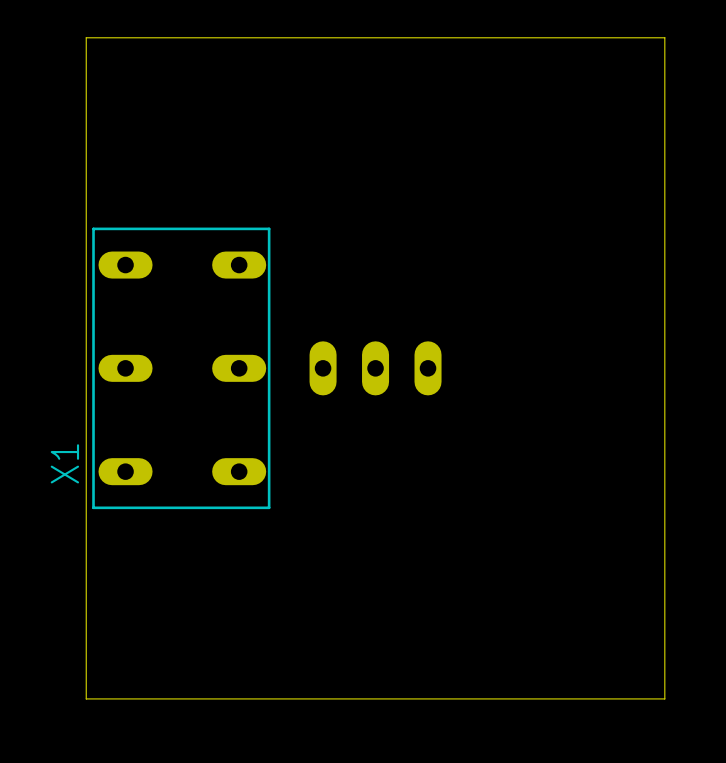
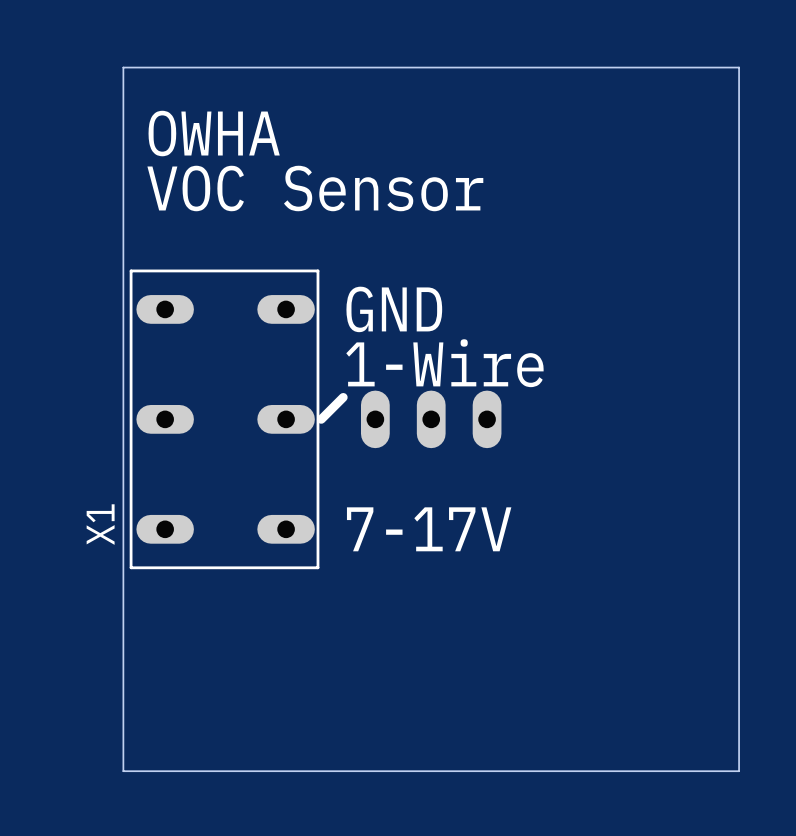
text: none -> OWHA (214, 133)
text: none -> VOC Sensor (315, 188)
text: none -> GND (394, 309)
text: none -> 1-Wire (444, 363)
line: none -> (343, 397) (321, 419)
text: none -> 7-17V (429, 529)

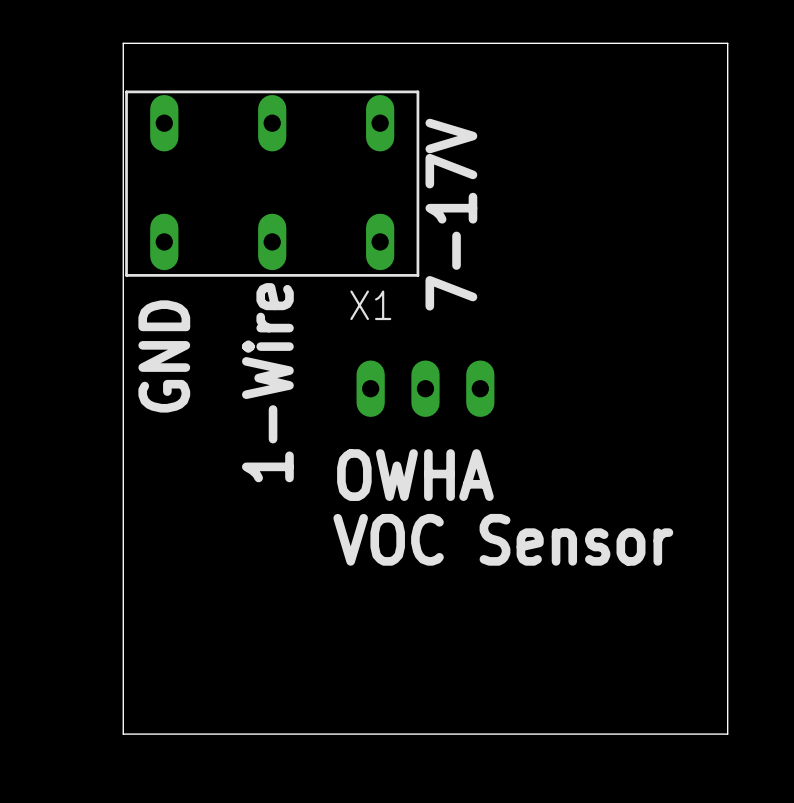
text position: OWHA (214, 133) -> OWHA (415, 475)
text position: VOC Sensor (315, 188) -> VOC Sensor (503, 539)
text rotation: 0° (394, 309) -> 90° counterclockwise (164, 356)
text position: GND (394, 309) -> GND (164, 356)
text rotation: 0° (444, 363) -> 90° counterclockwise (267, 382)
line: (343, 397) (321, 419) -> none
X1 rotation: 0° (224, 419) -> 90° counterclockwise (272, 183)
X1 position: (224, 419) -> (272, 183)
text rotation: 0° (429, 529) -> 90° counterclockwise (451, 214)
text position: 7-17V (429, 529) -> 7-17V (451, 214)

